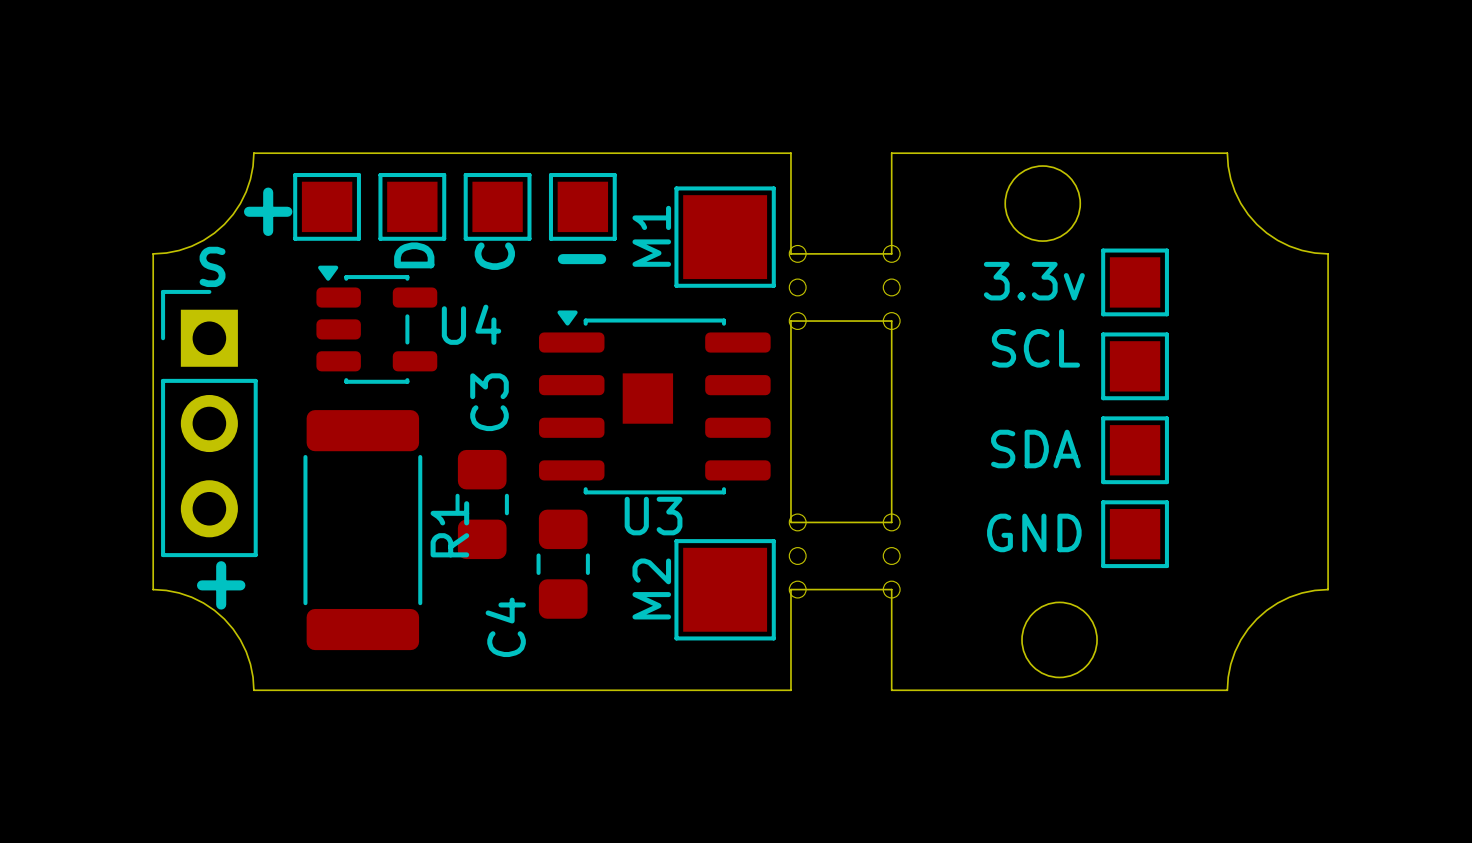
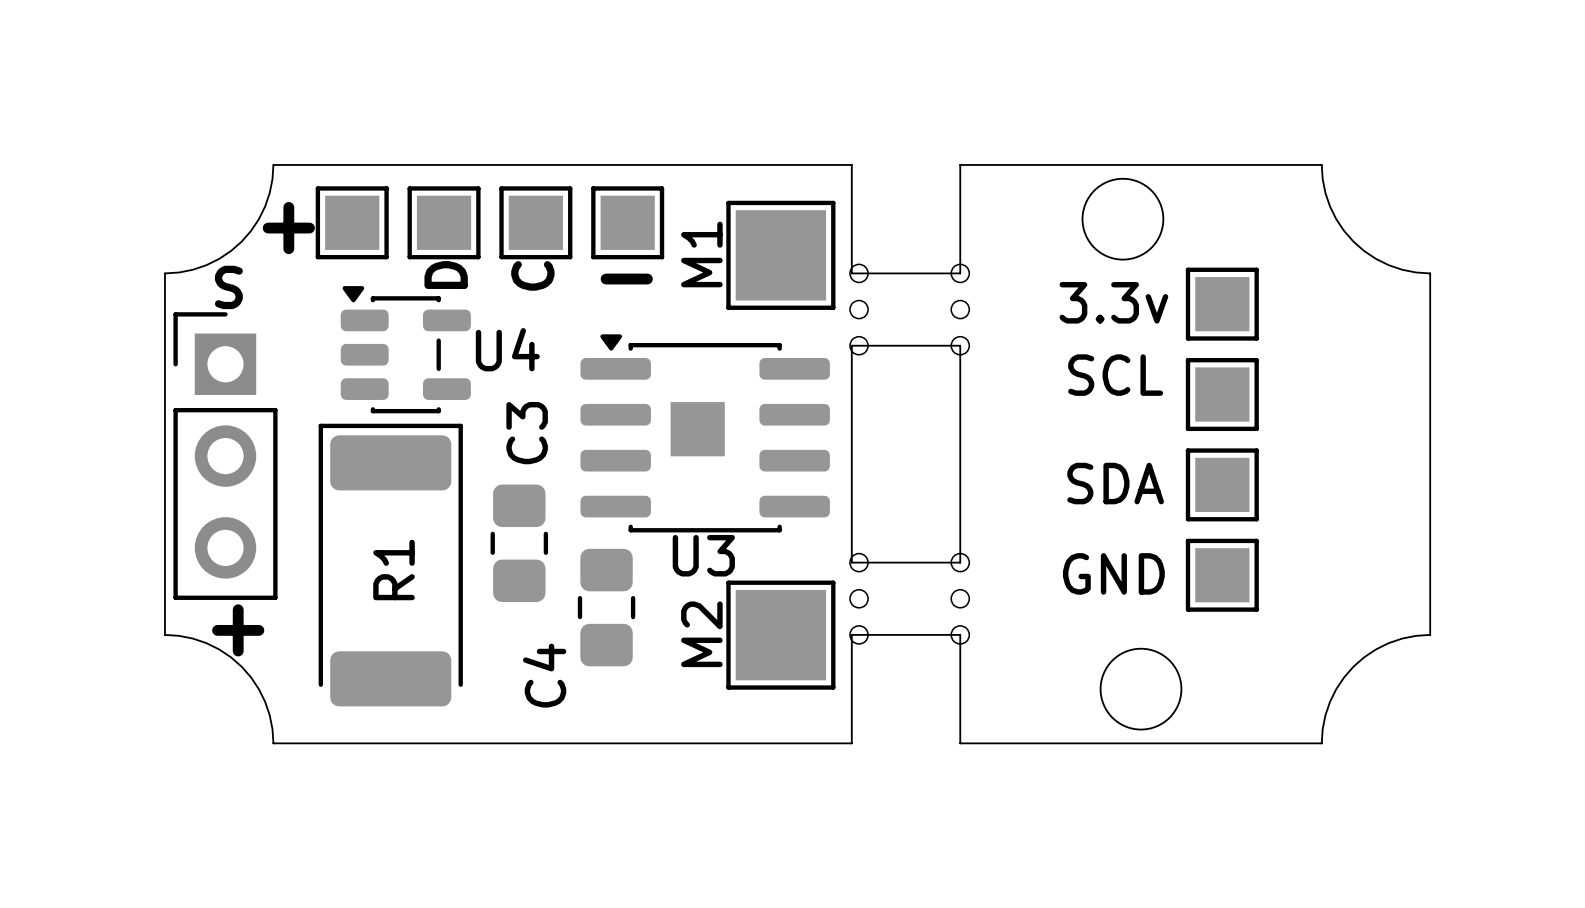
R1 footprint: [303, 410, 423, 651] -> [318, 423, 463, 707]
R1 name position: R1 (449, 529) -> R1 (394, 569)

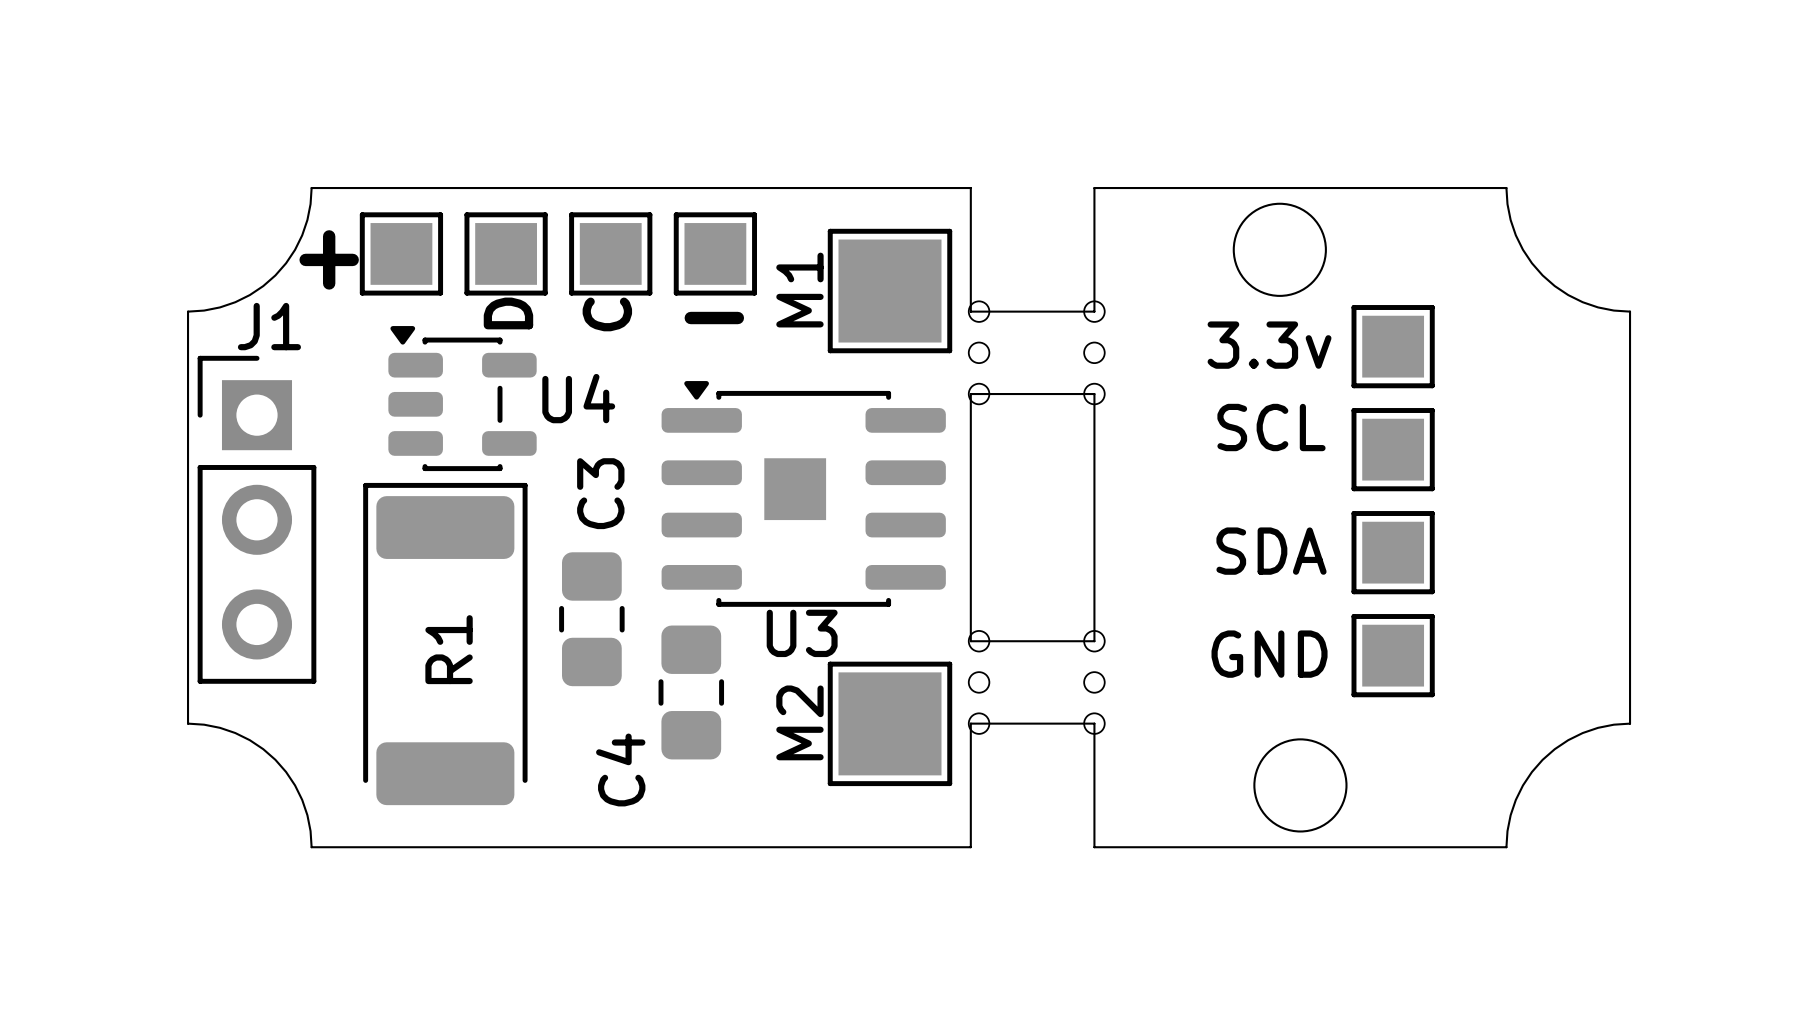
J1 name: none -> J1 (269, 326)
text: S (228, 287) -> none
text: + (238, 630) -> none

